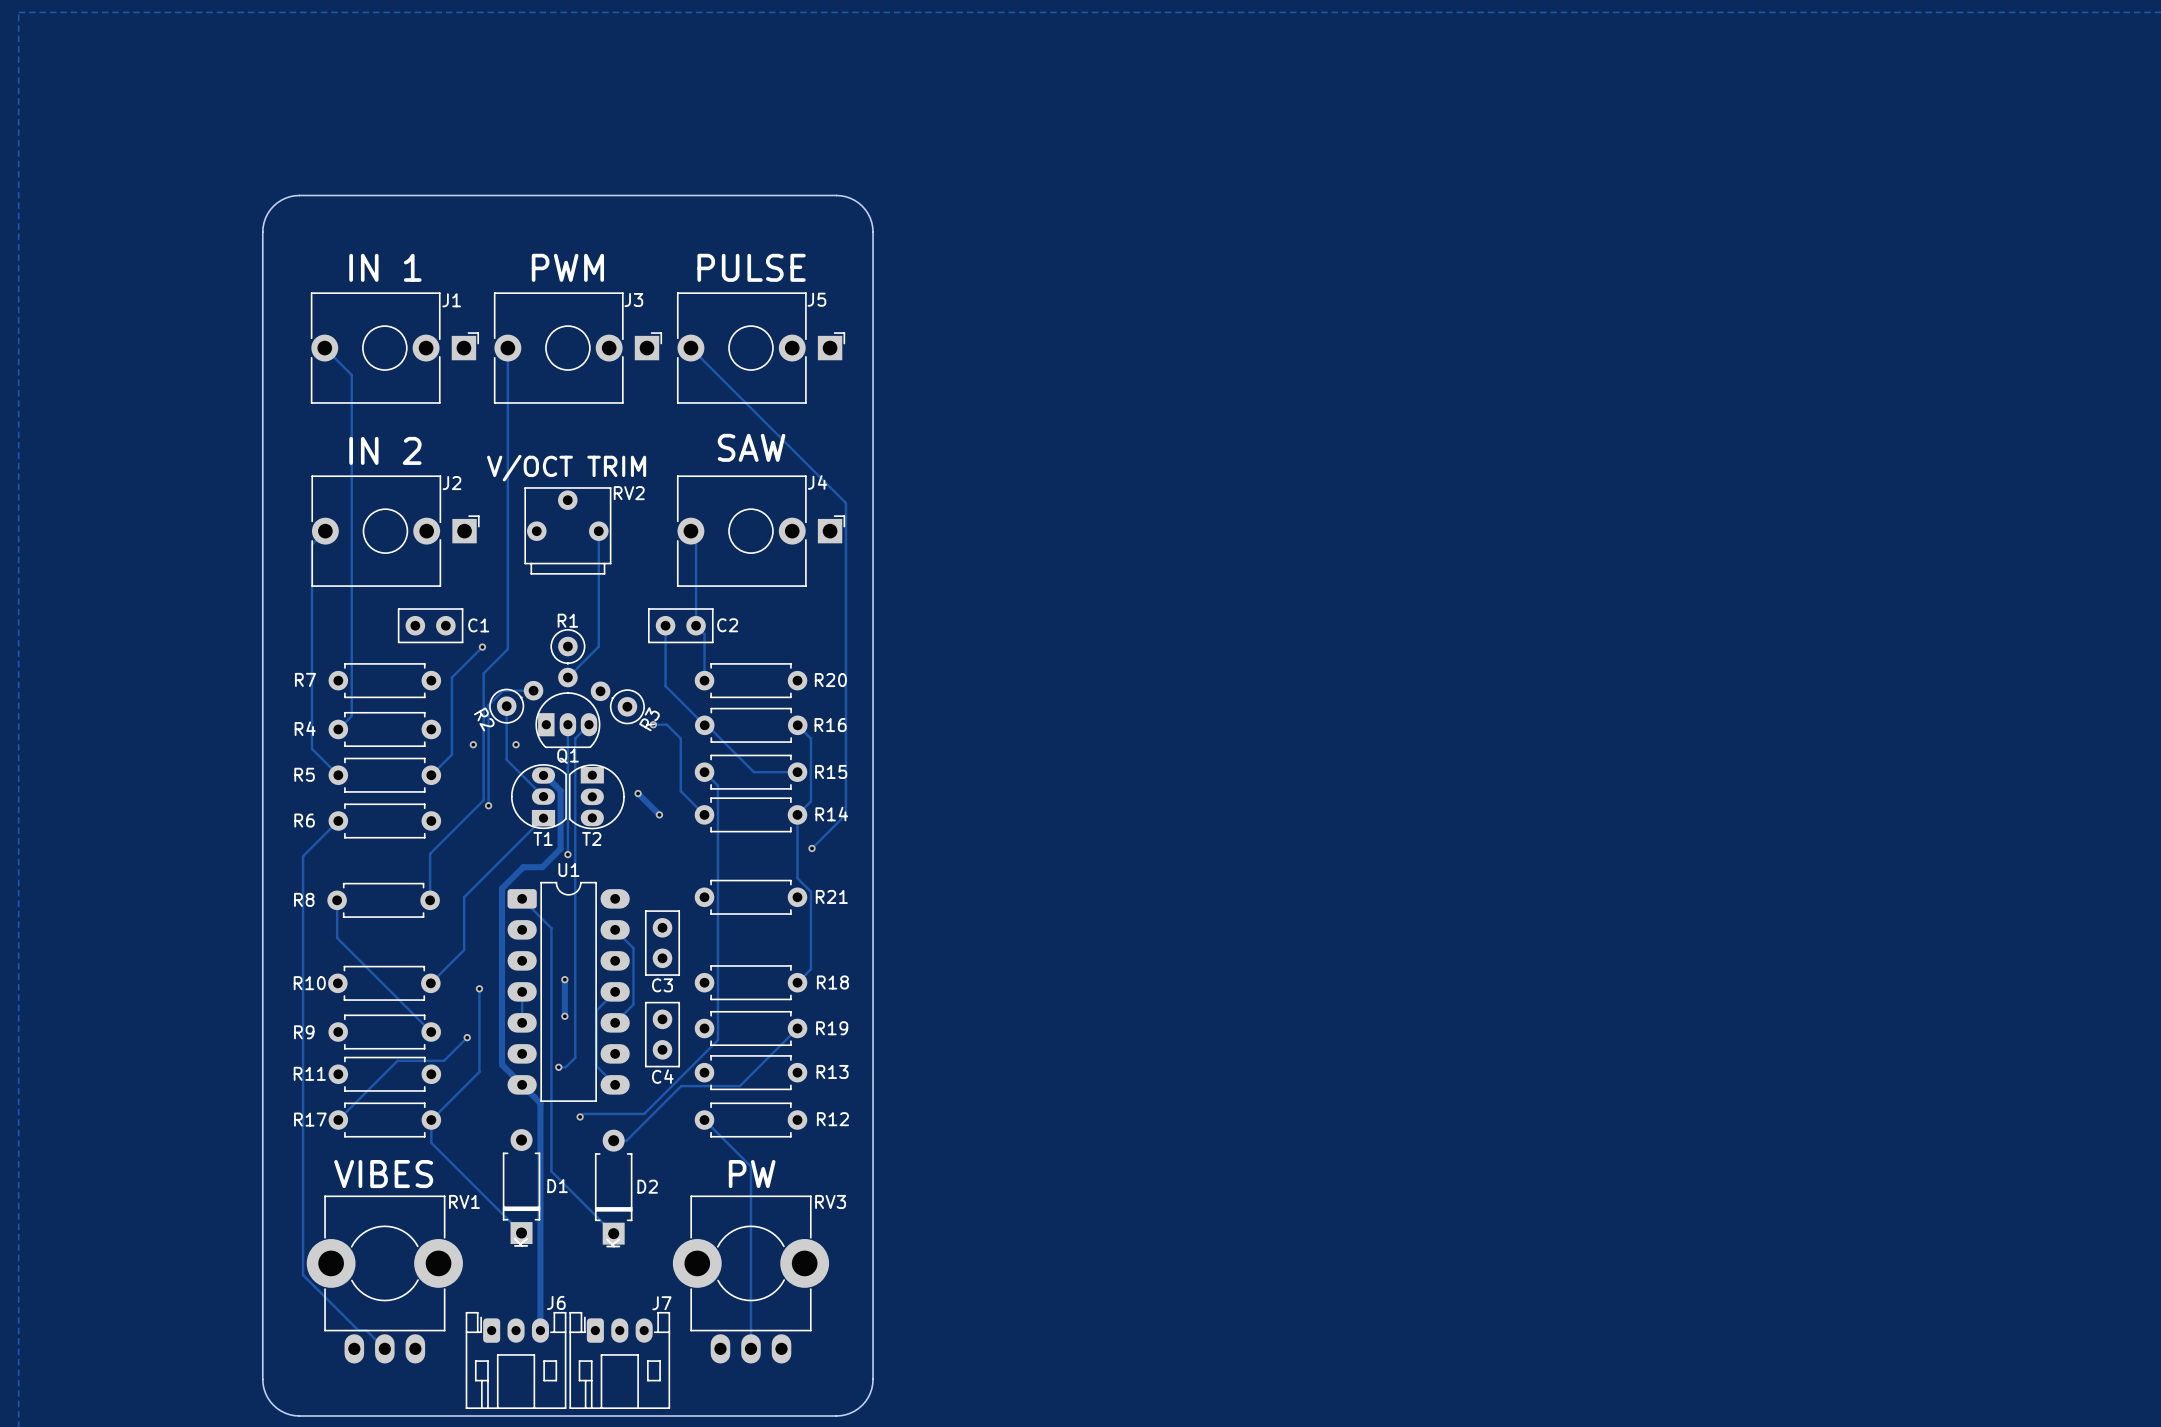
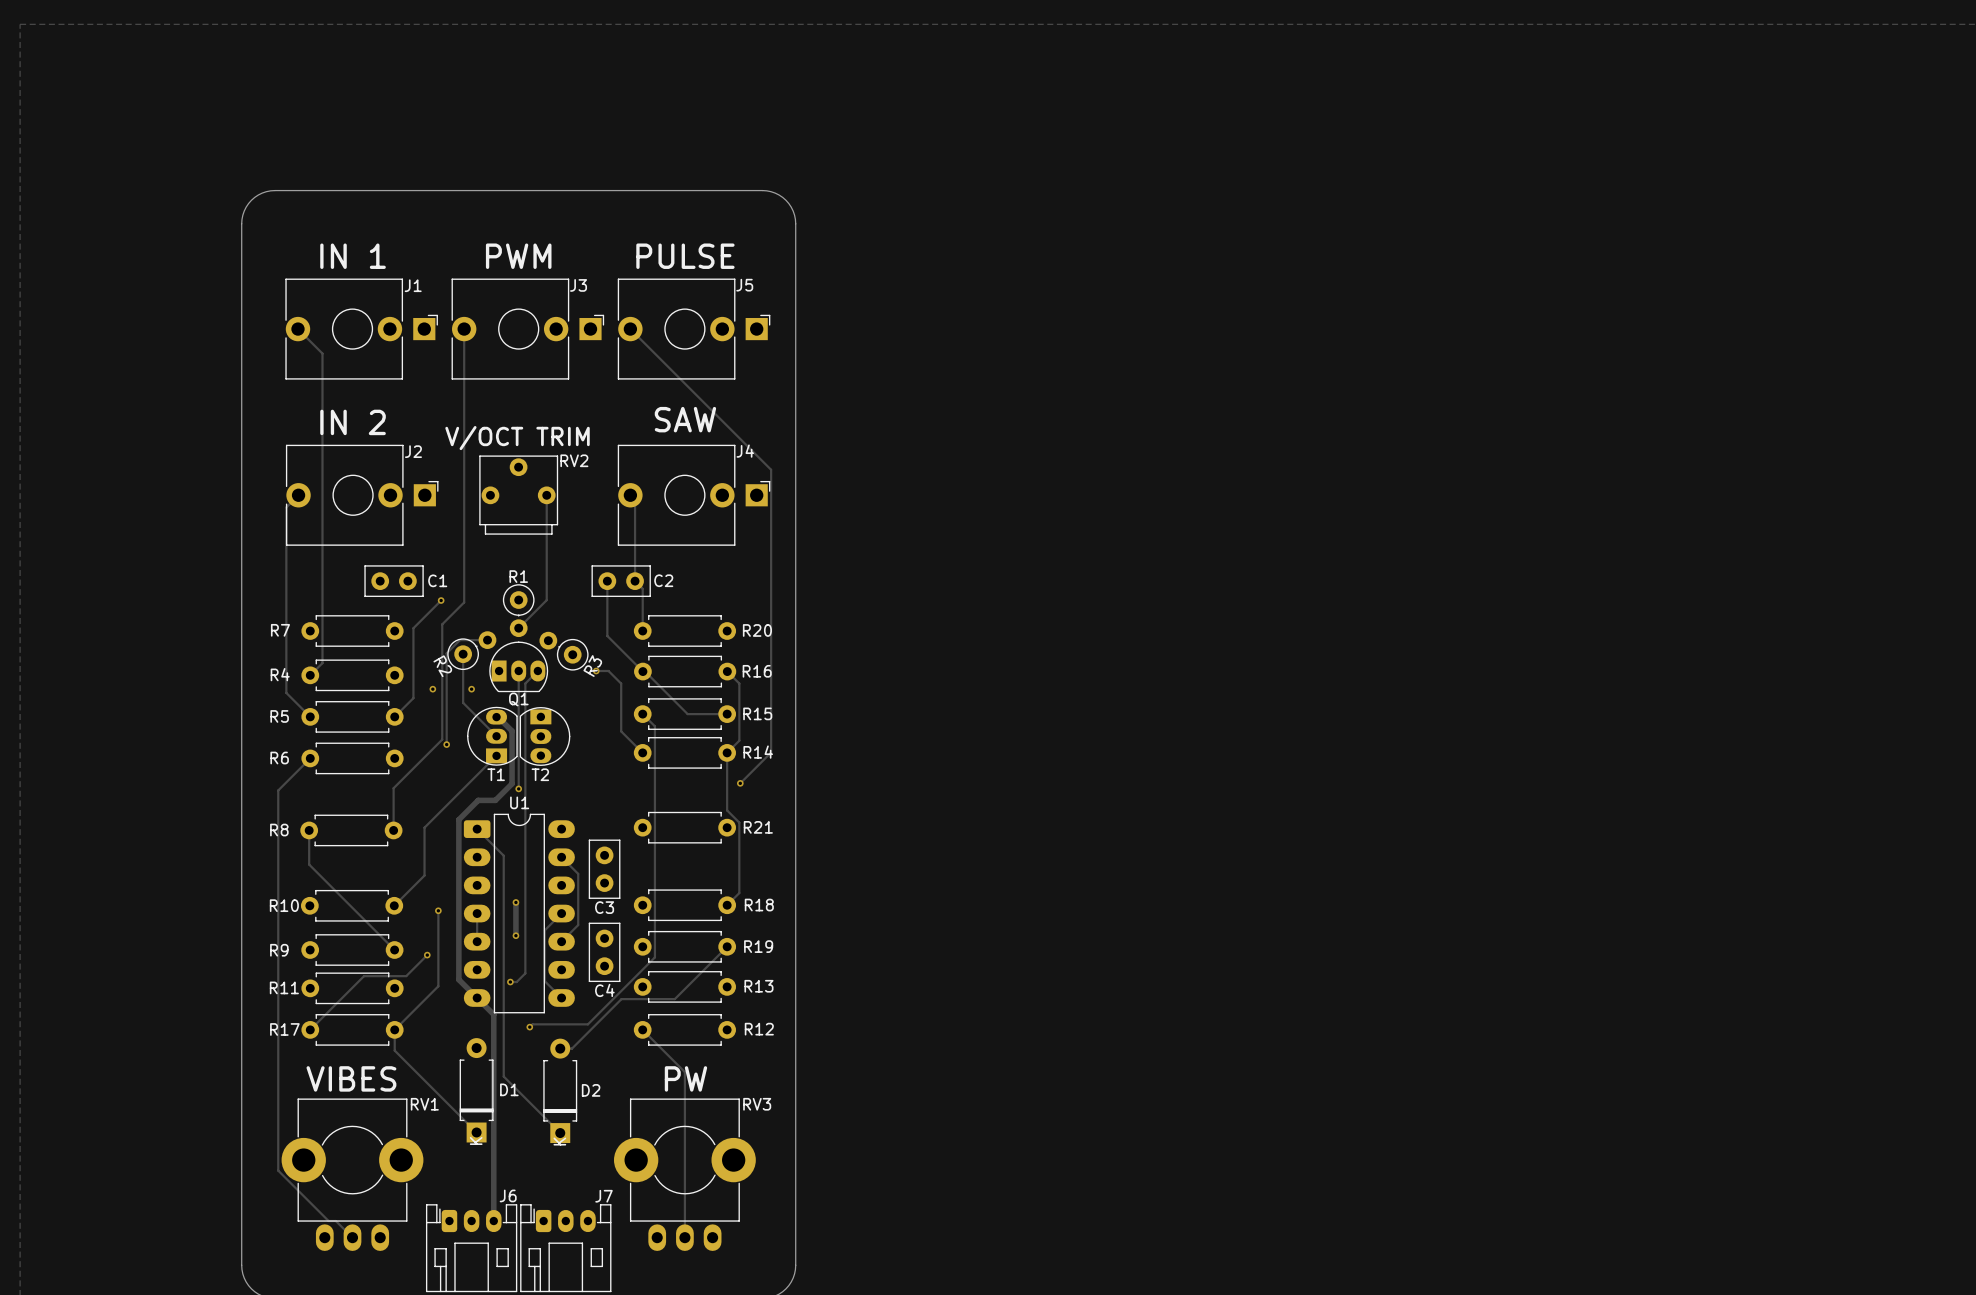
track: (638, 793) (659, 814) -> none
via: (638, 793) -> none
via: (659, 814) -> none

